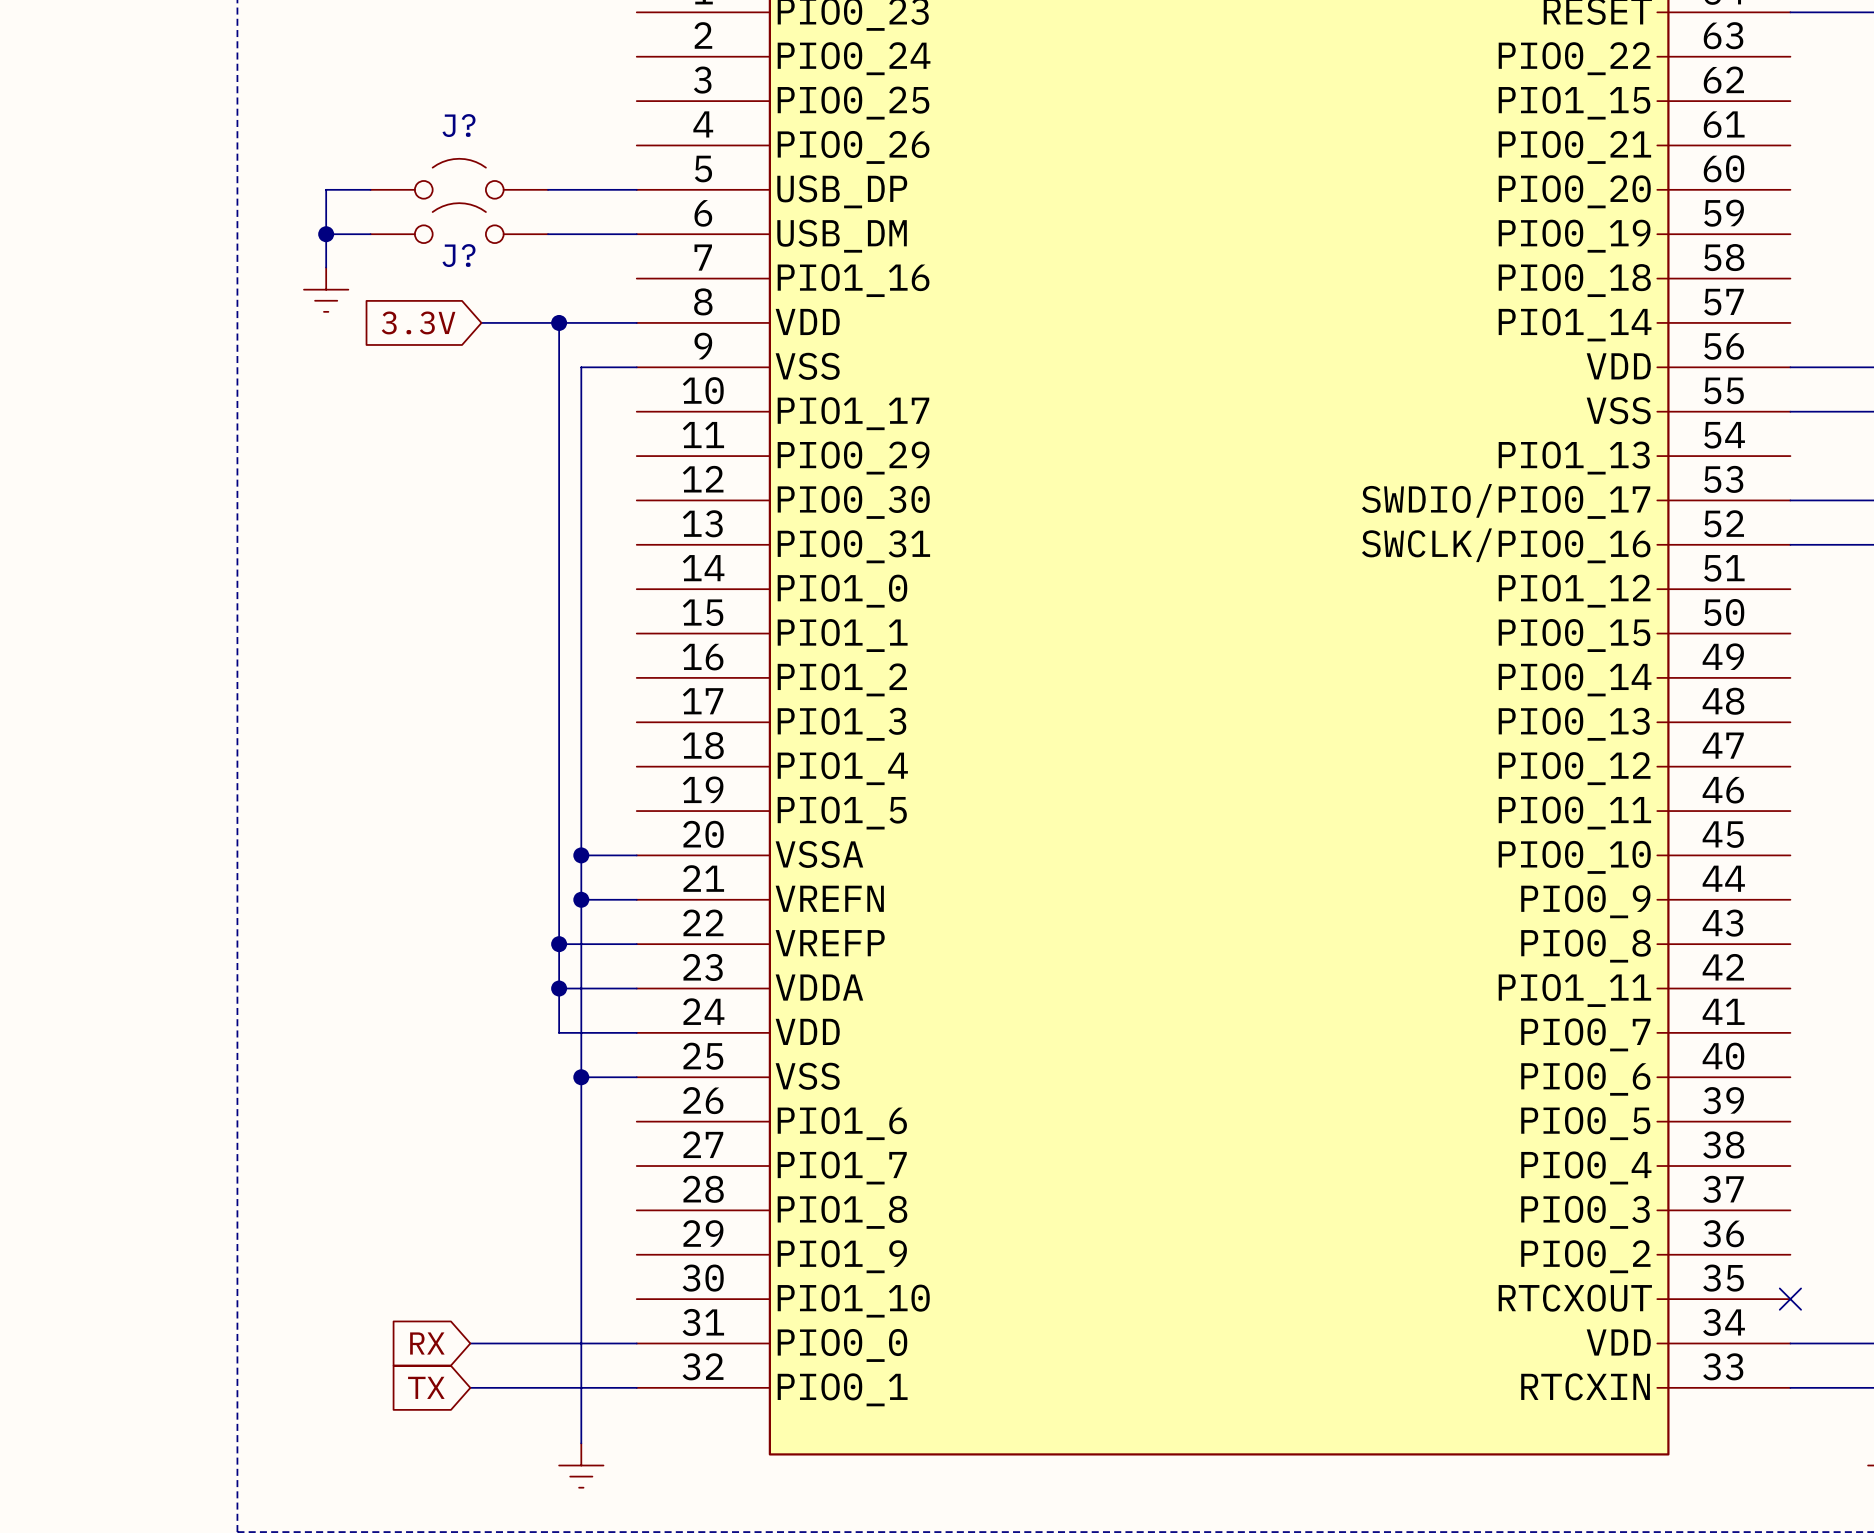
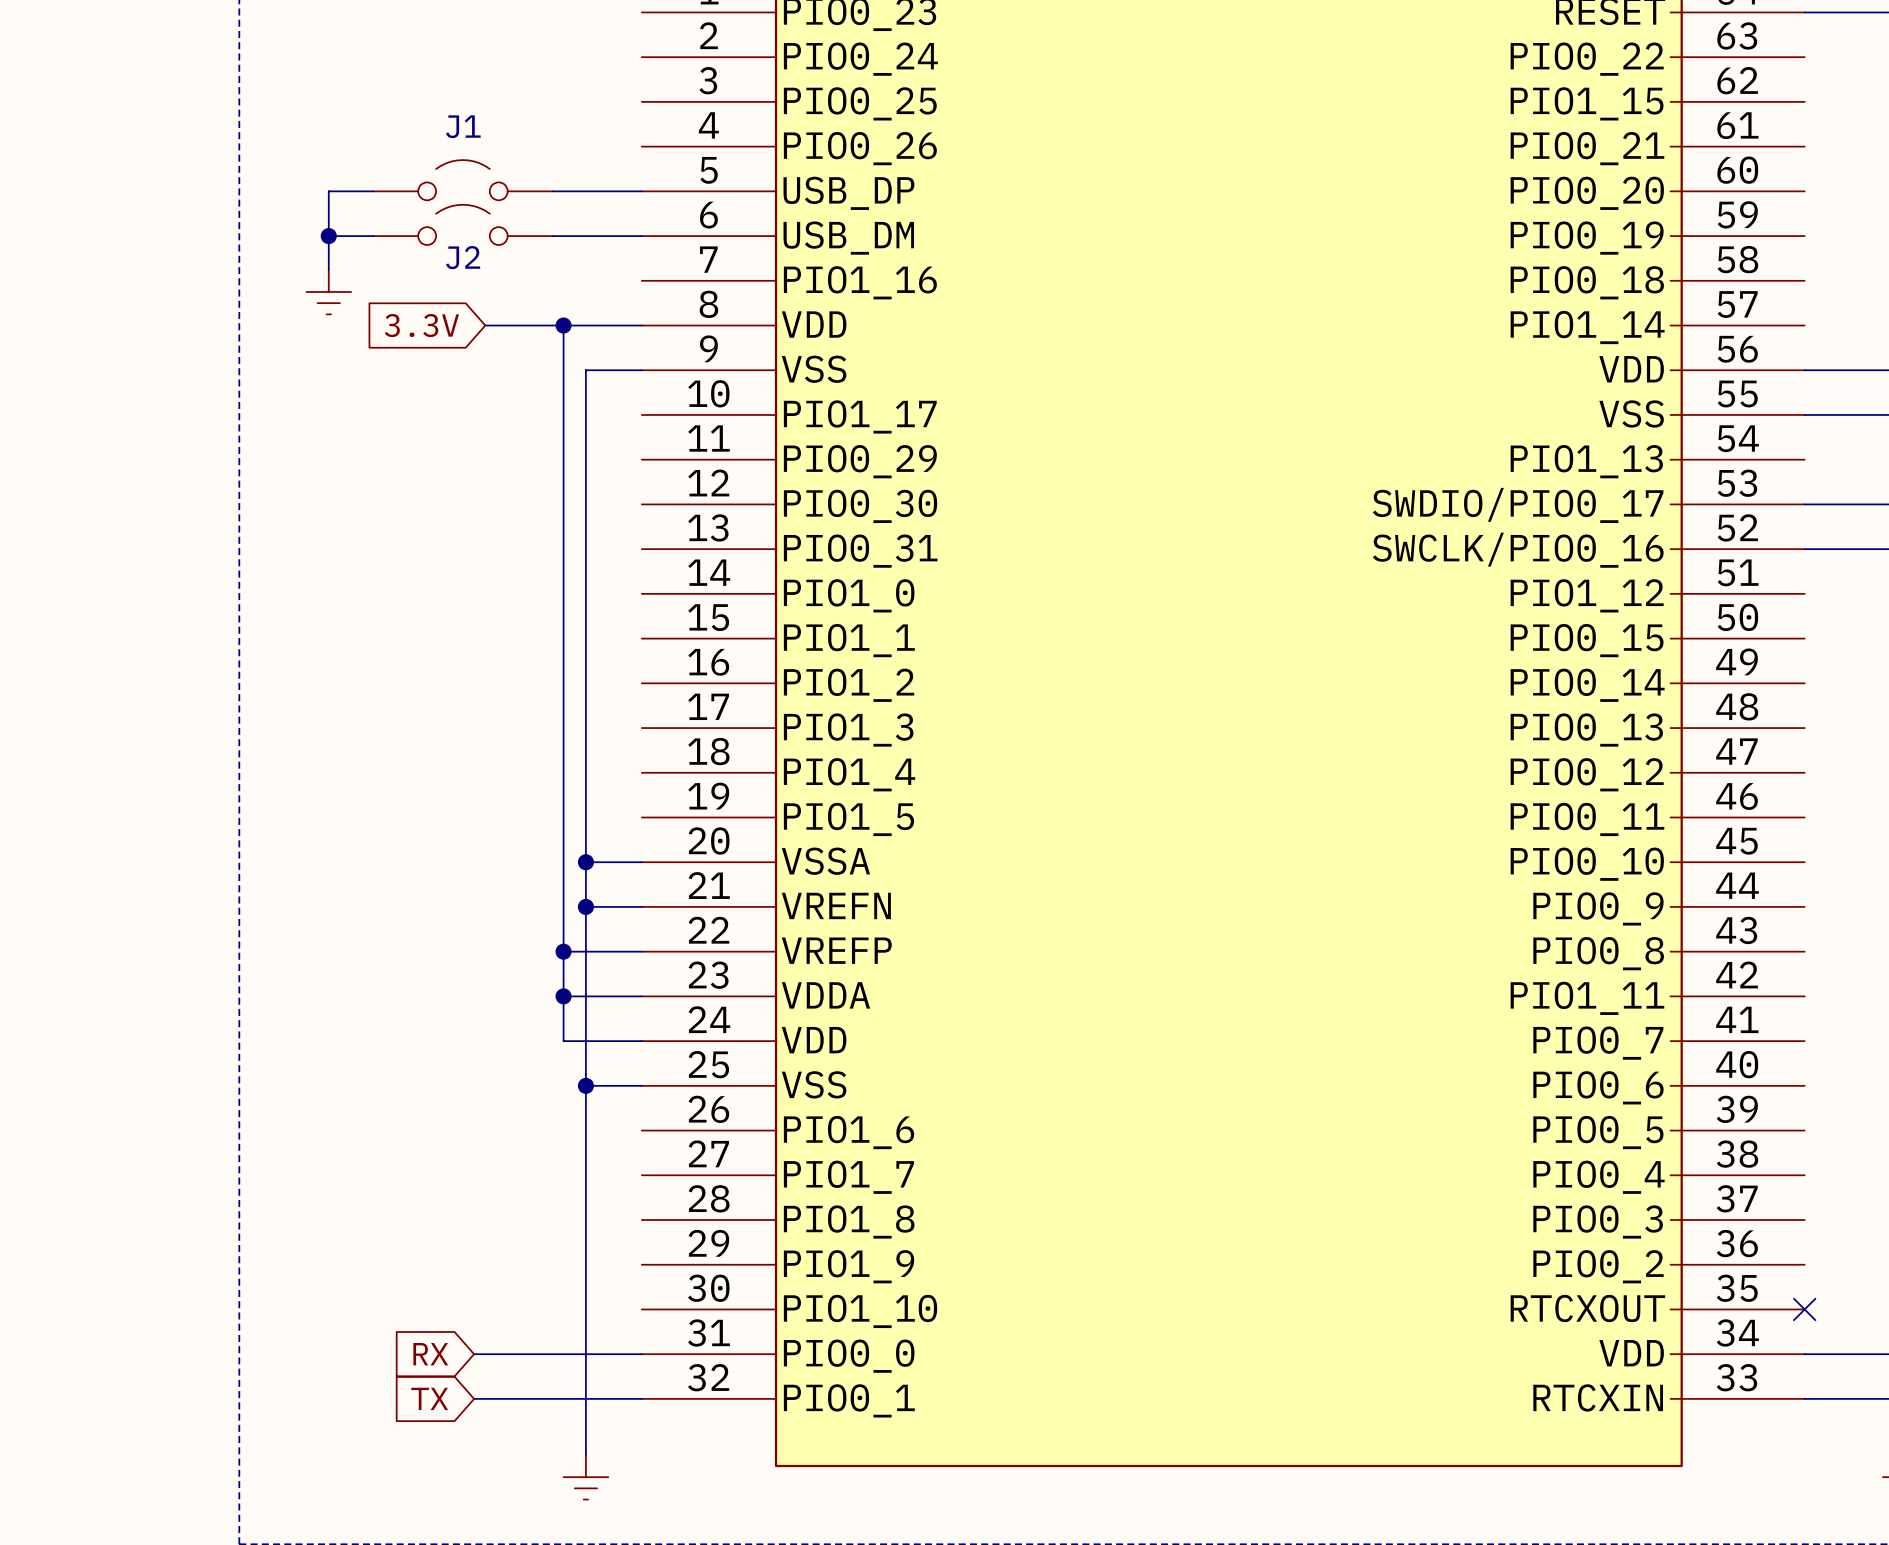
J? name: J? (459, 125) -> J1 (463, 126)
J? name: J? (459, 255) -> J2 (463, 257)

